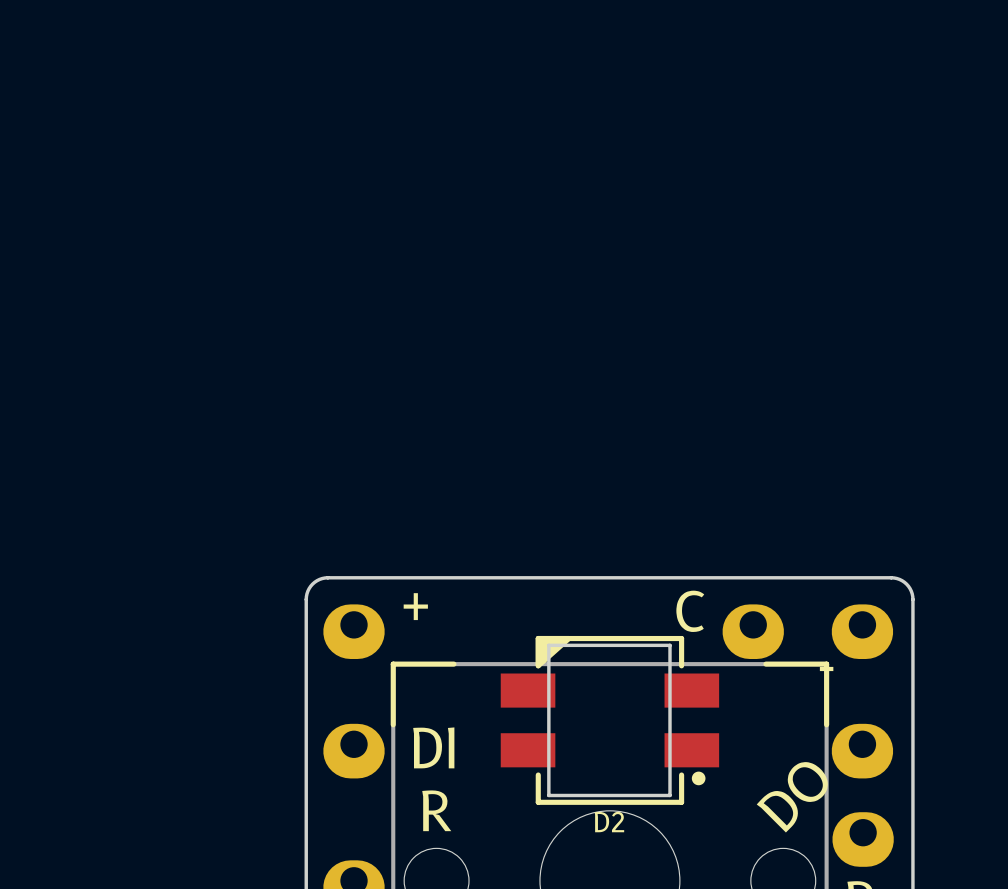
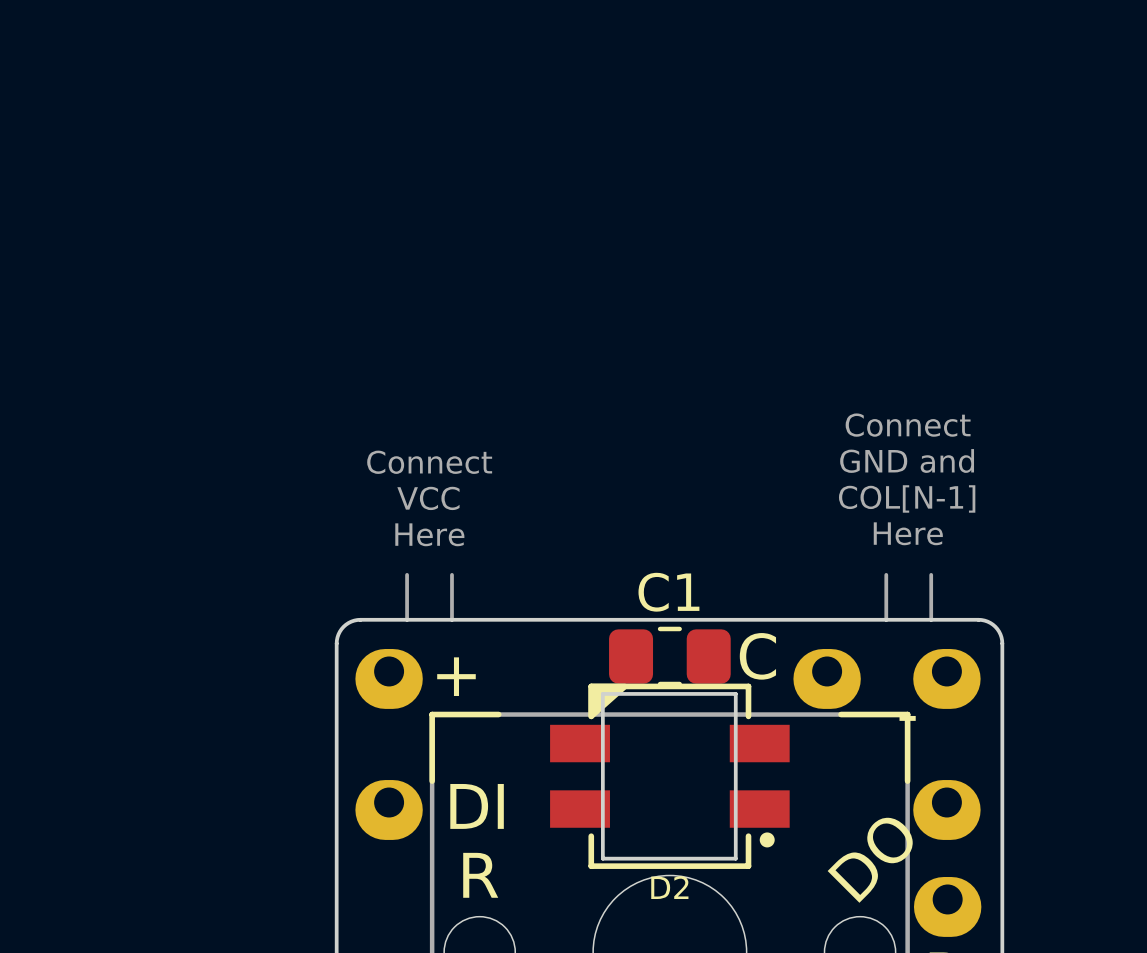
text: none -> Connect (908, 425)
text: none -> GND and (907, 460)
text: none -> Connect (429, 462)
text: none -> VCC (428, 498)
text: none -> COL[N-1] (907, 498)
text: none -> Here (908, 533)
text: none -> Here (429, 534)
line: none -> (407, 574) (407, 619)
line: none -> (451, 574) (451, 619)
line: none -> (886, 574) (886, 619)
line: none -> (931, 574) (931, 619)
text position: + (415, 606) -> + (456, 676)
C1: none -> (669, 656)

